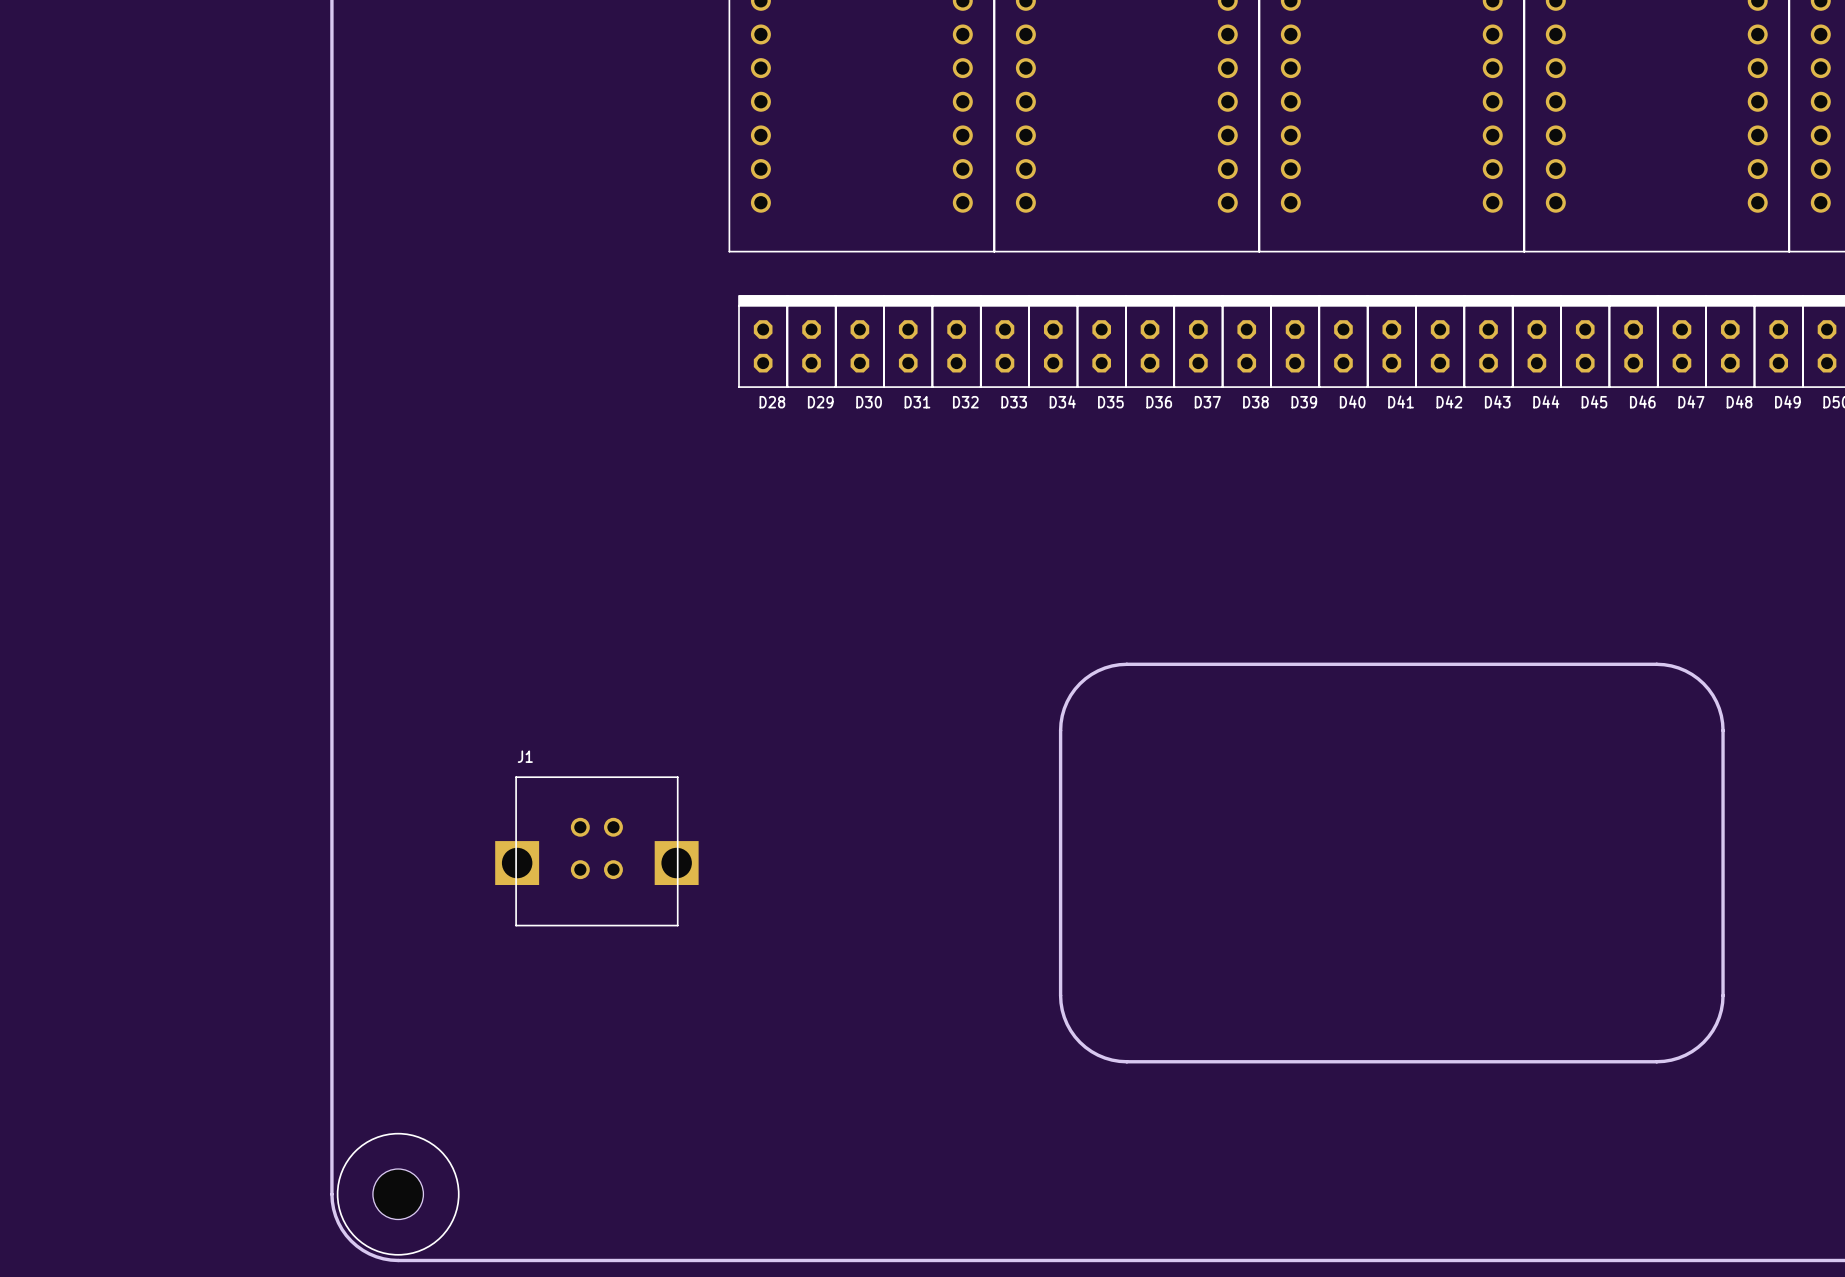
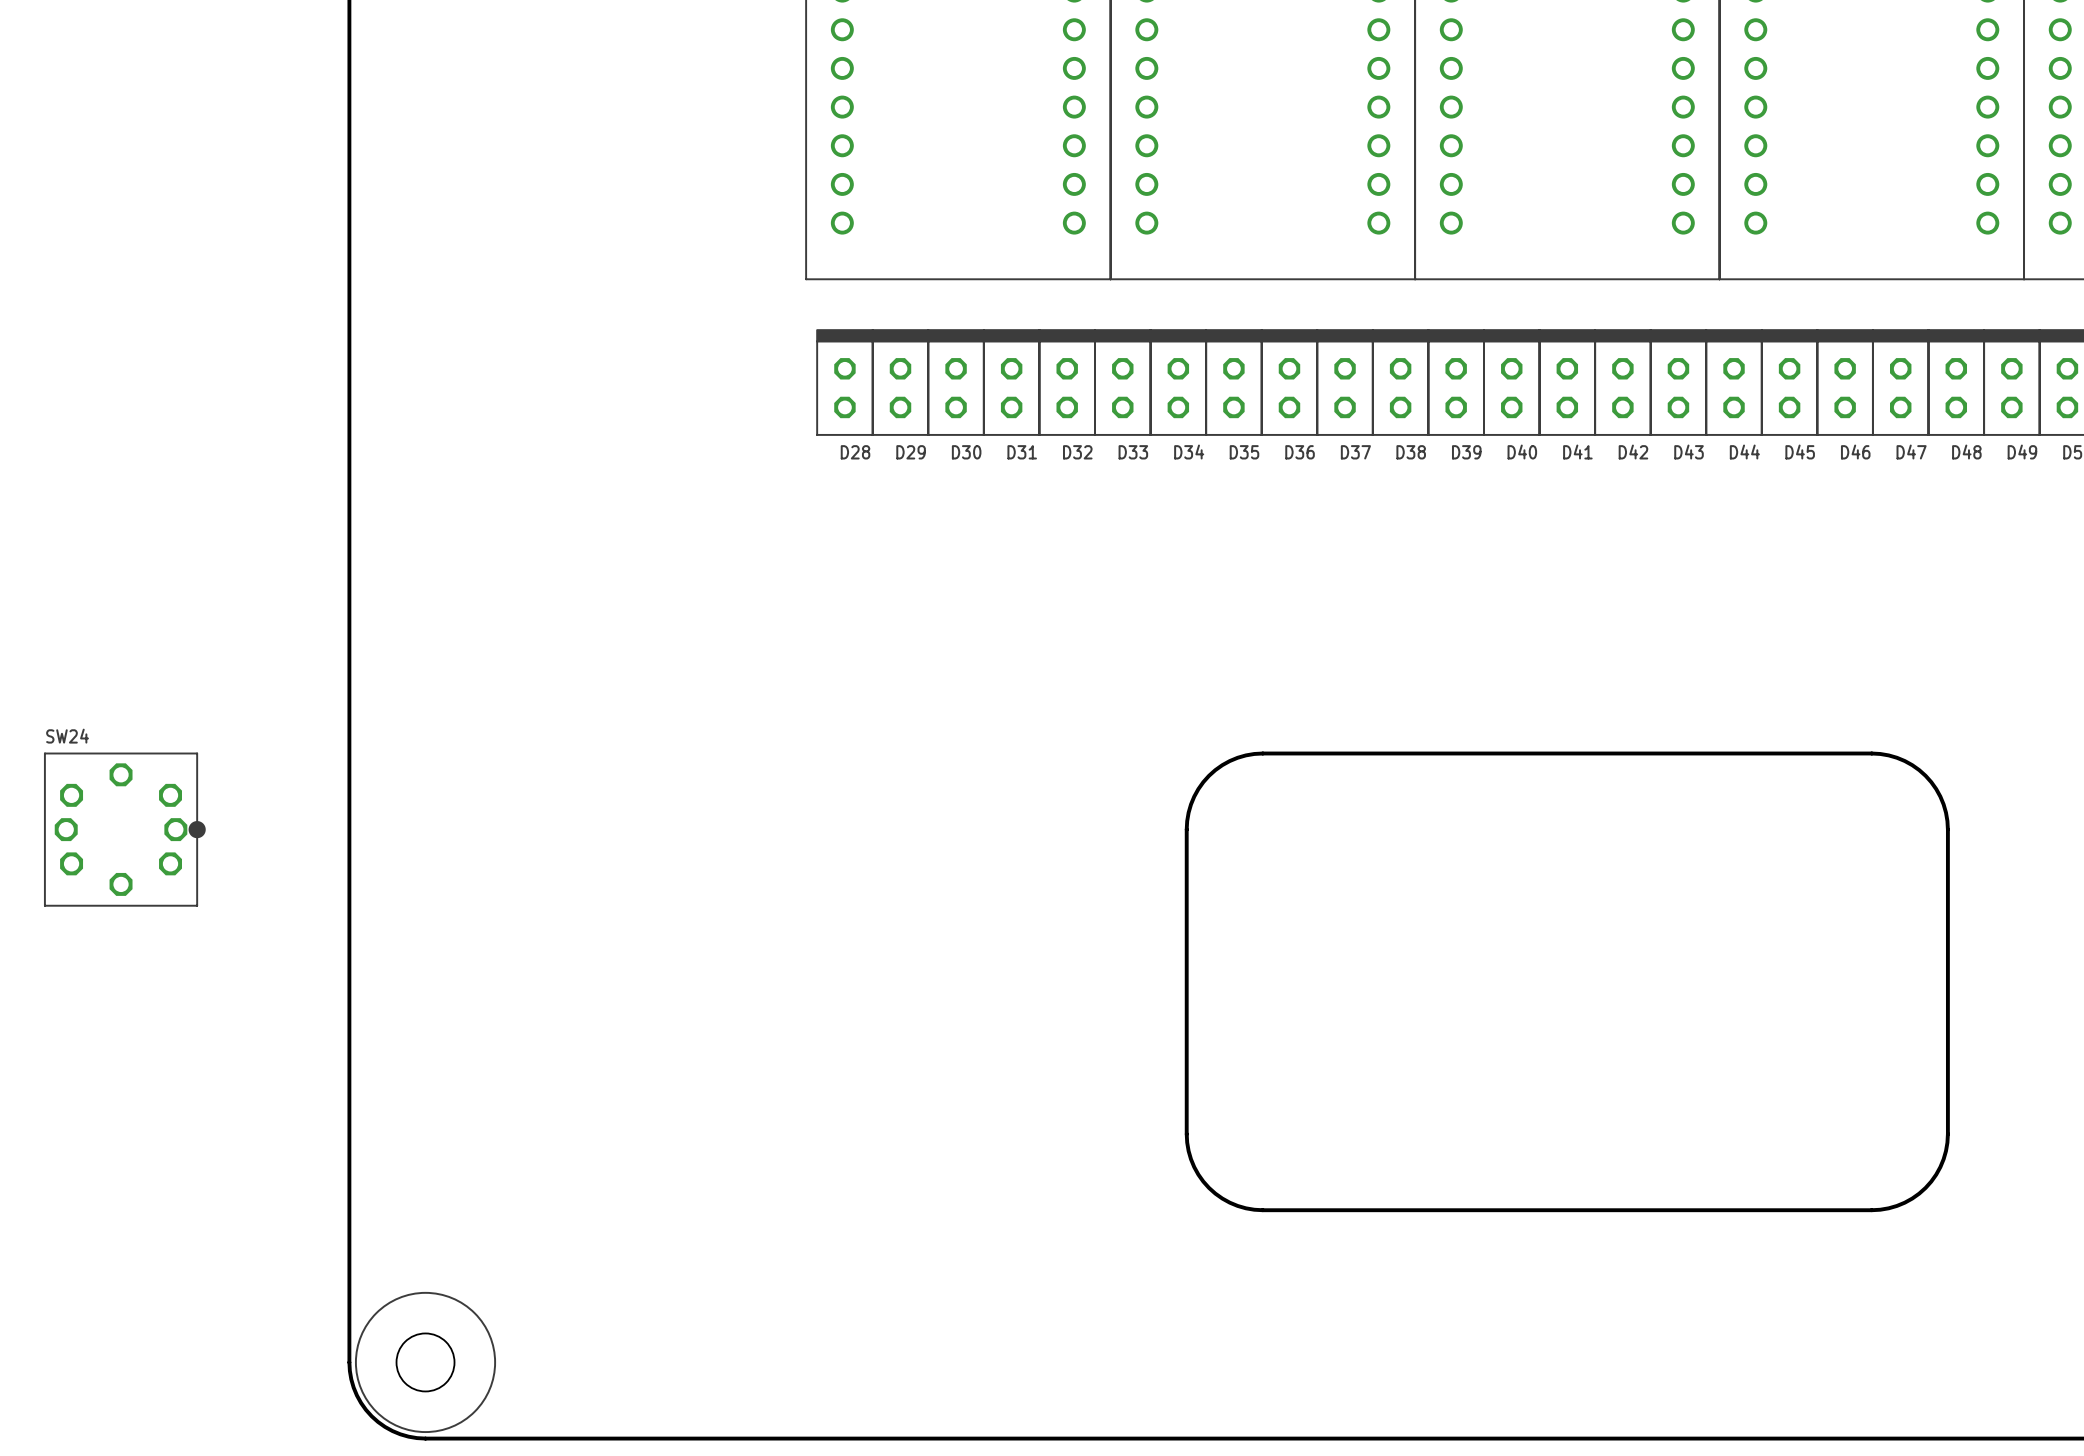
SW24: none -> (124, 829)
J1: (596, 851) -> none

